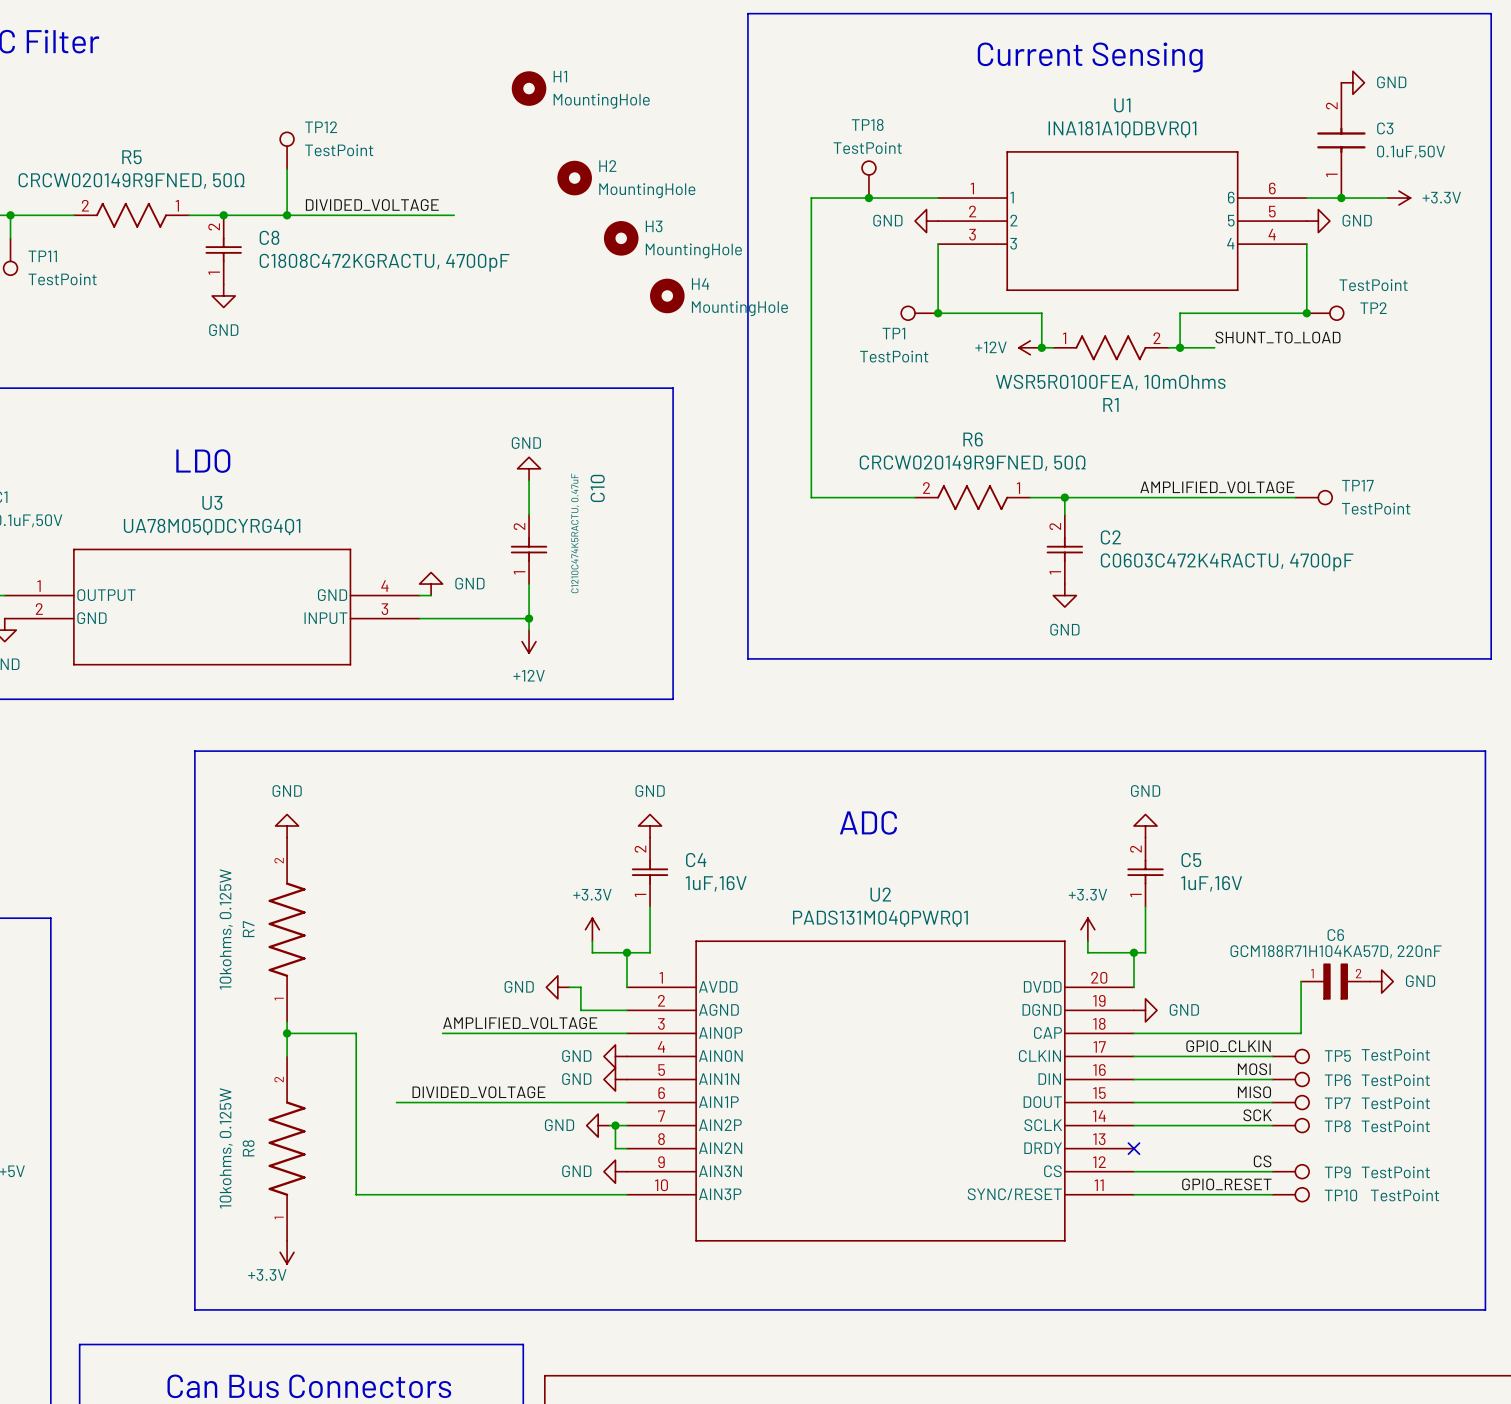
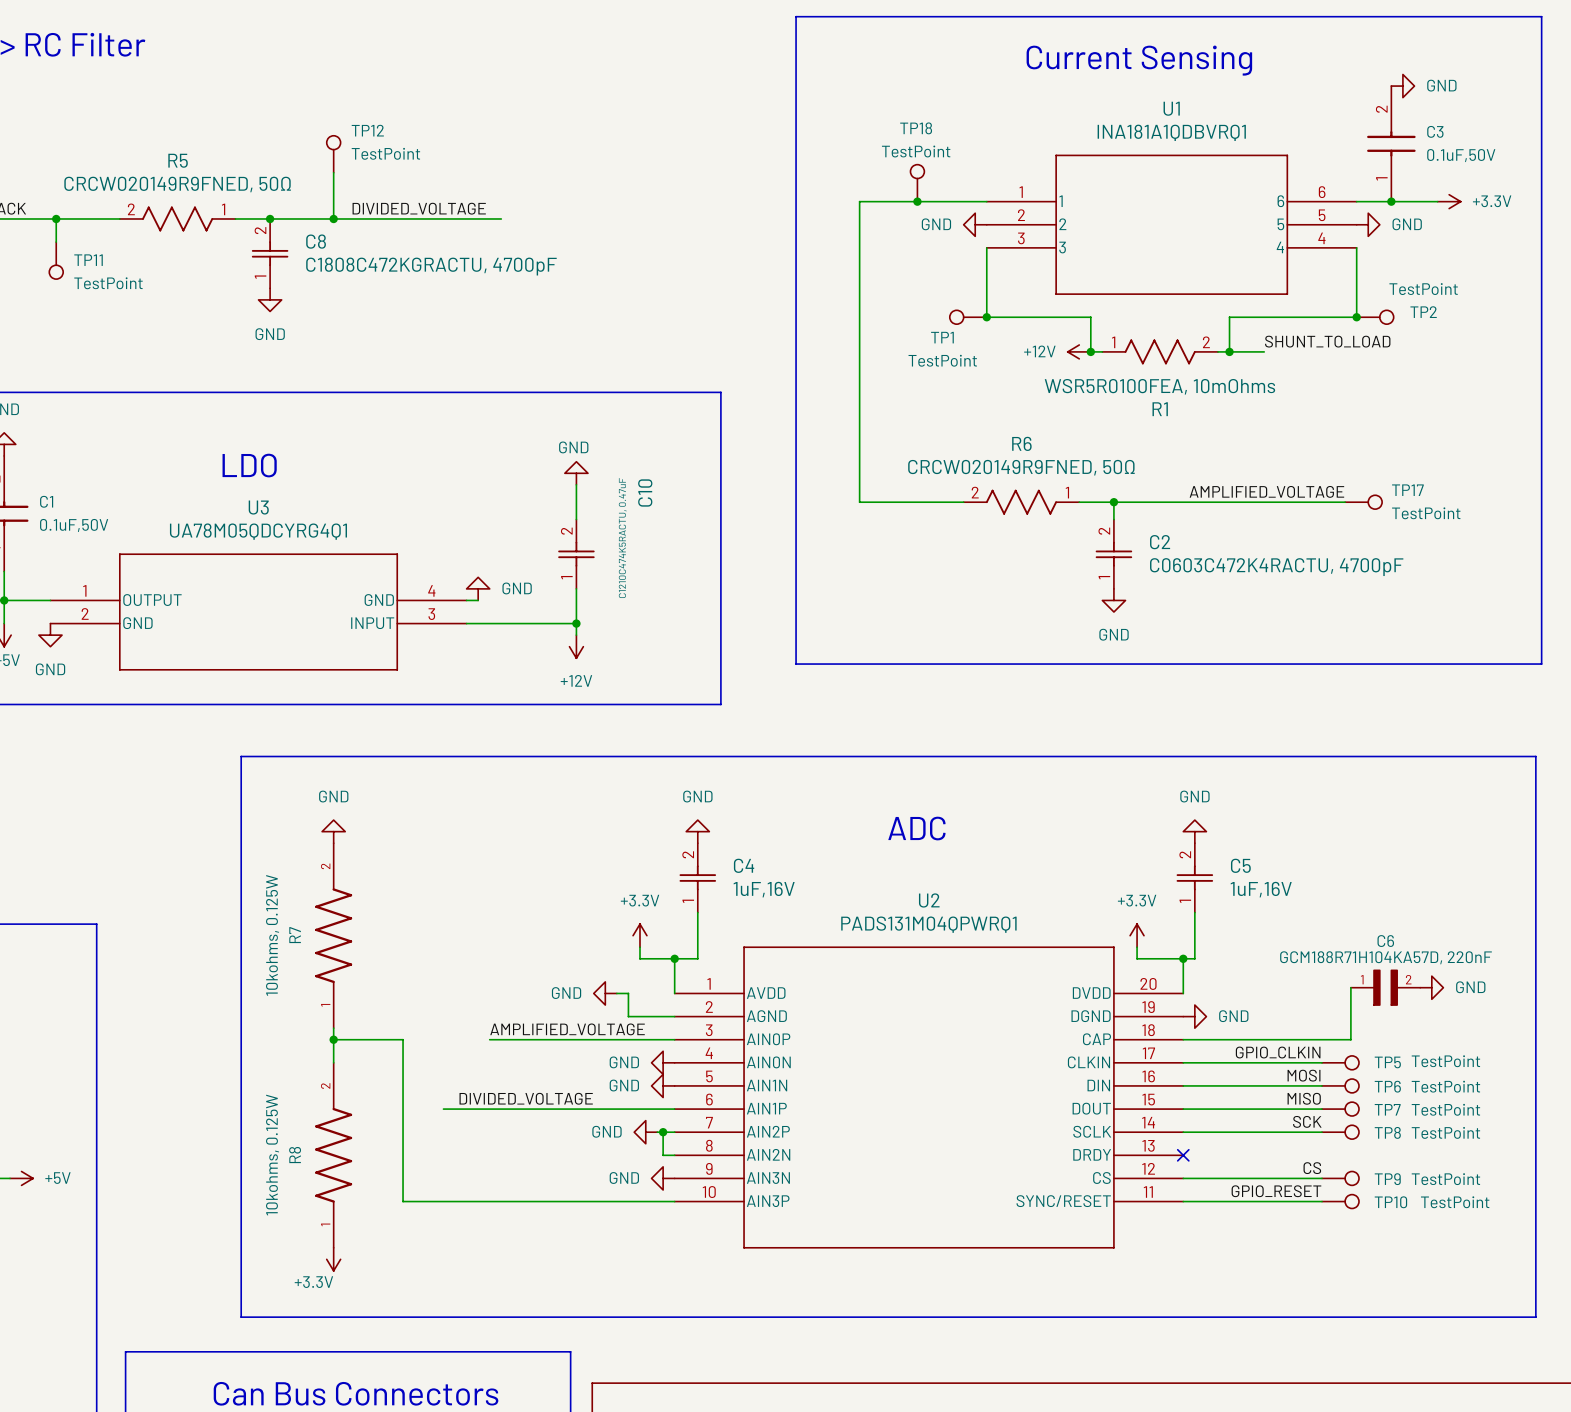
H1: MountingHole (529, 88) -> none
H2: MountingHole (574, 178) -> none
H3: MountingHole (621, 238) -> none
H4: MountingHole (667, 295) -> none

